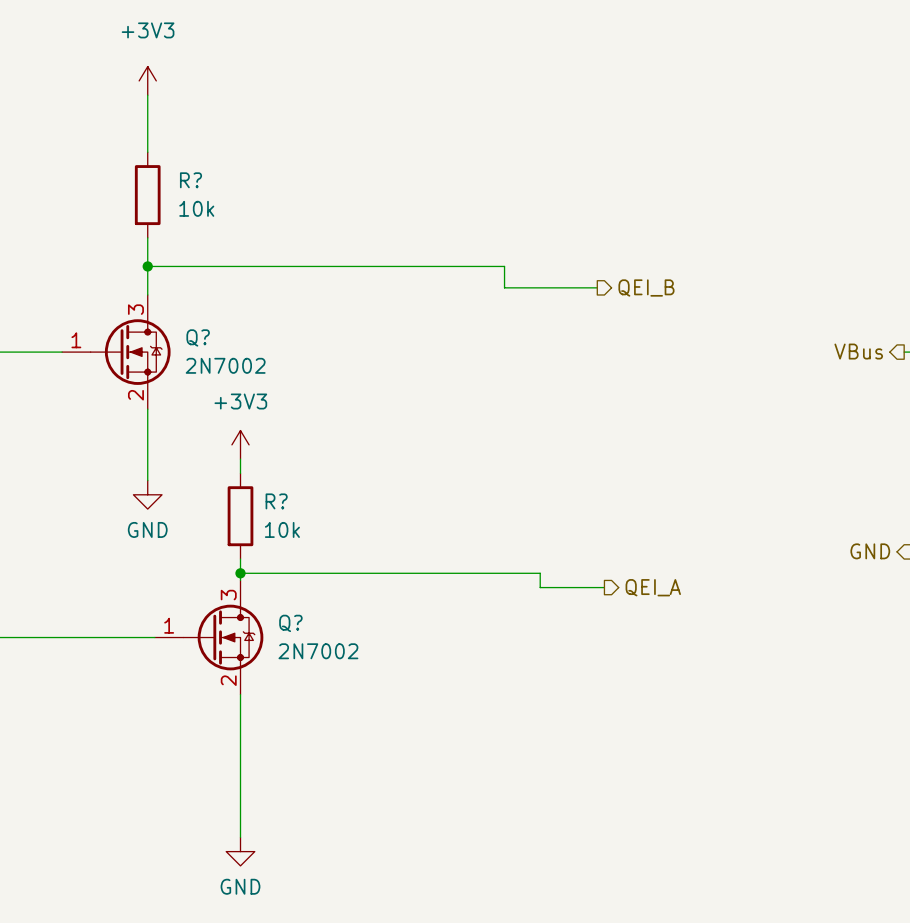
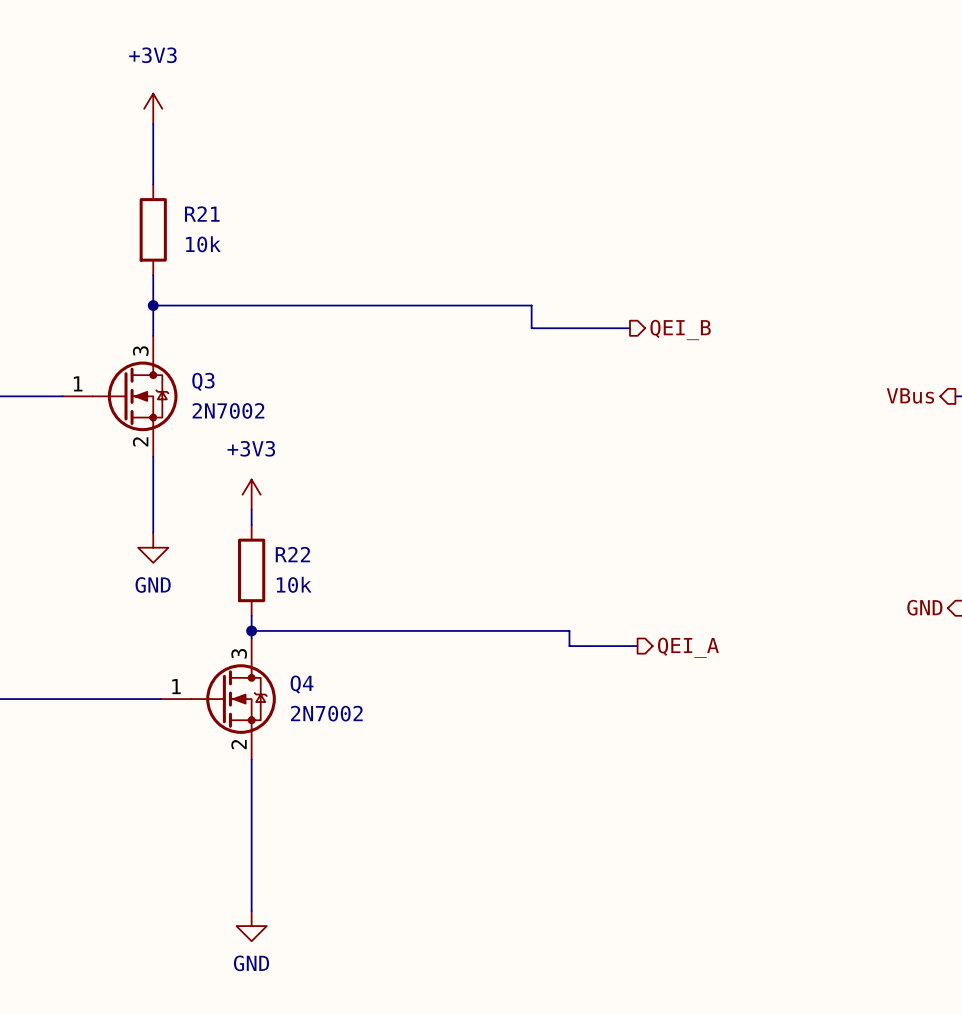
R? name: R? (190, 180) -> R21 (202, 214)
Q? name: Q? (198, 337) -> Q3 (203, 381)
R? name: R? (276, 501) -> R22 (292, 554)
Q? name: Q? (290, 623) -> Q4 (302, 684)

